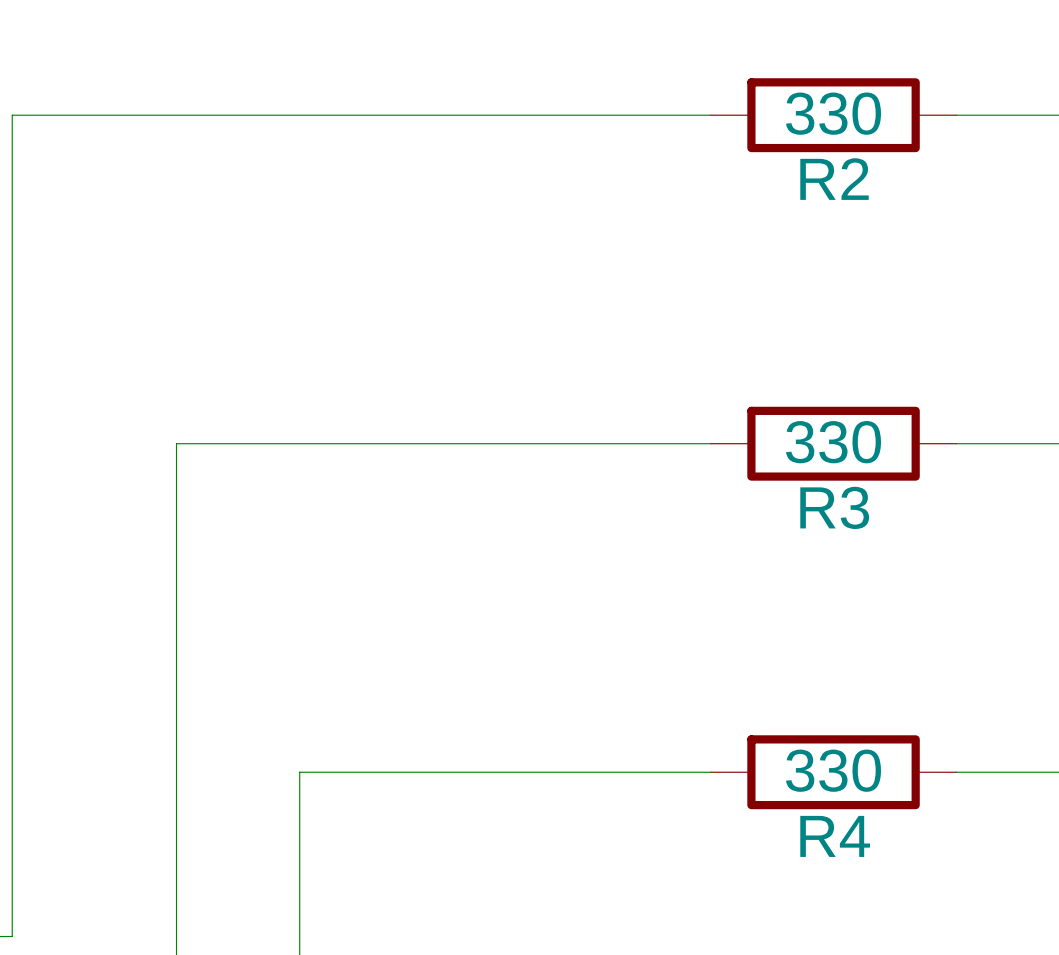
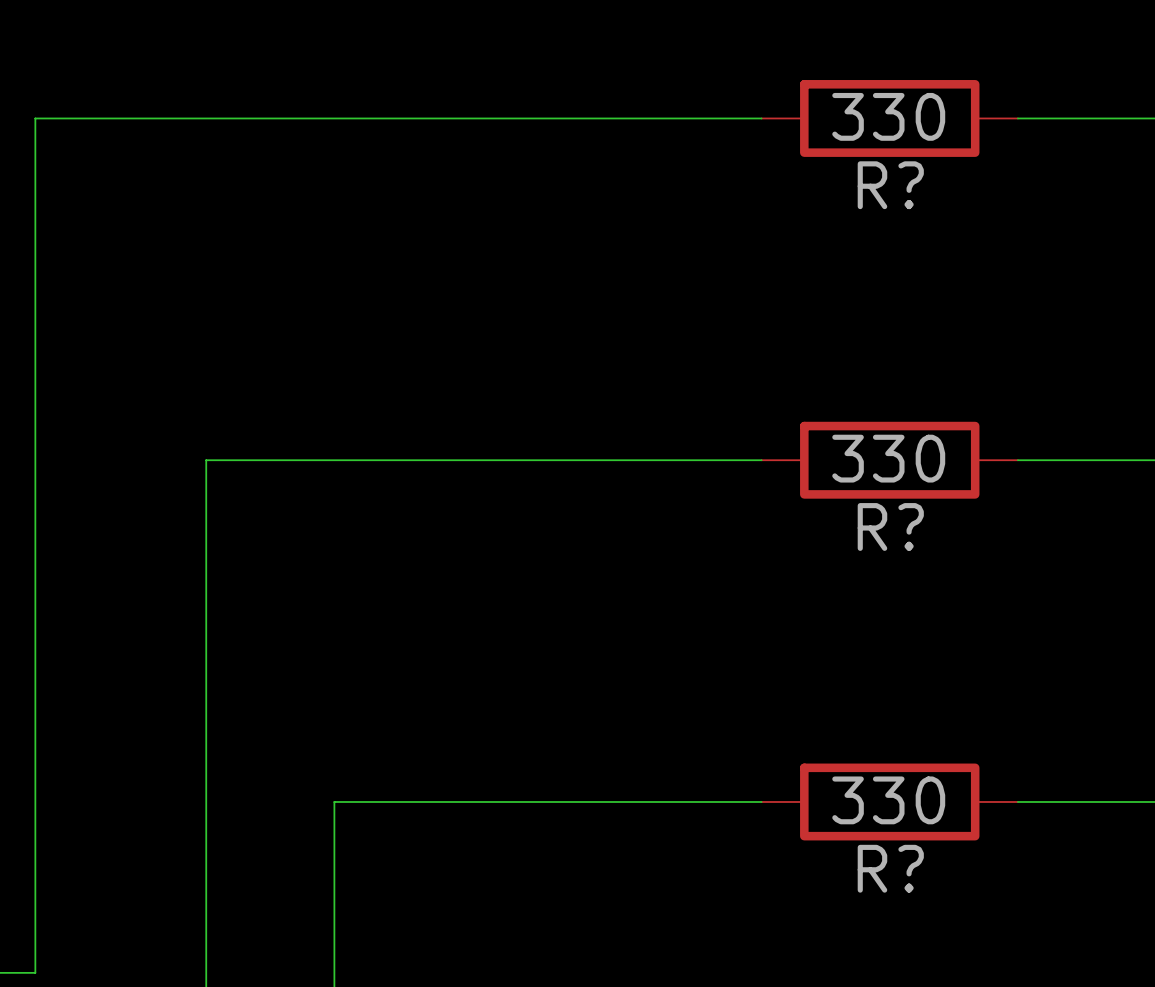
R2 name: R2 (834, 179) -> R? (890, 185)
R3 name: R3 (834, 507) -> R? (890, 526)
R4 name: R4 (835, 836) -> R? (890, 868)

